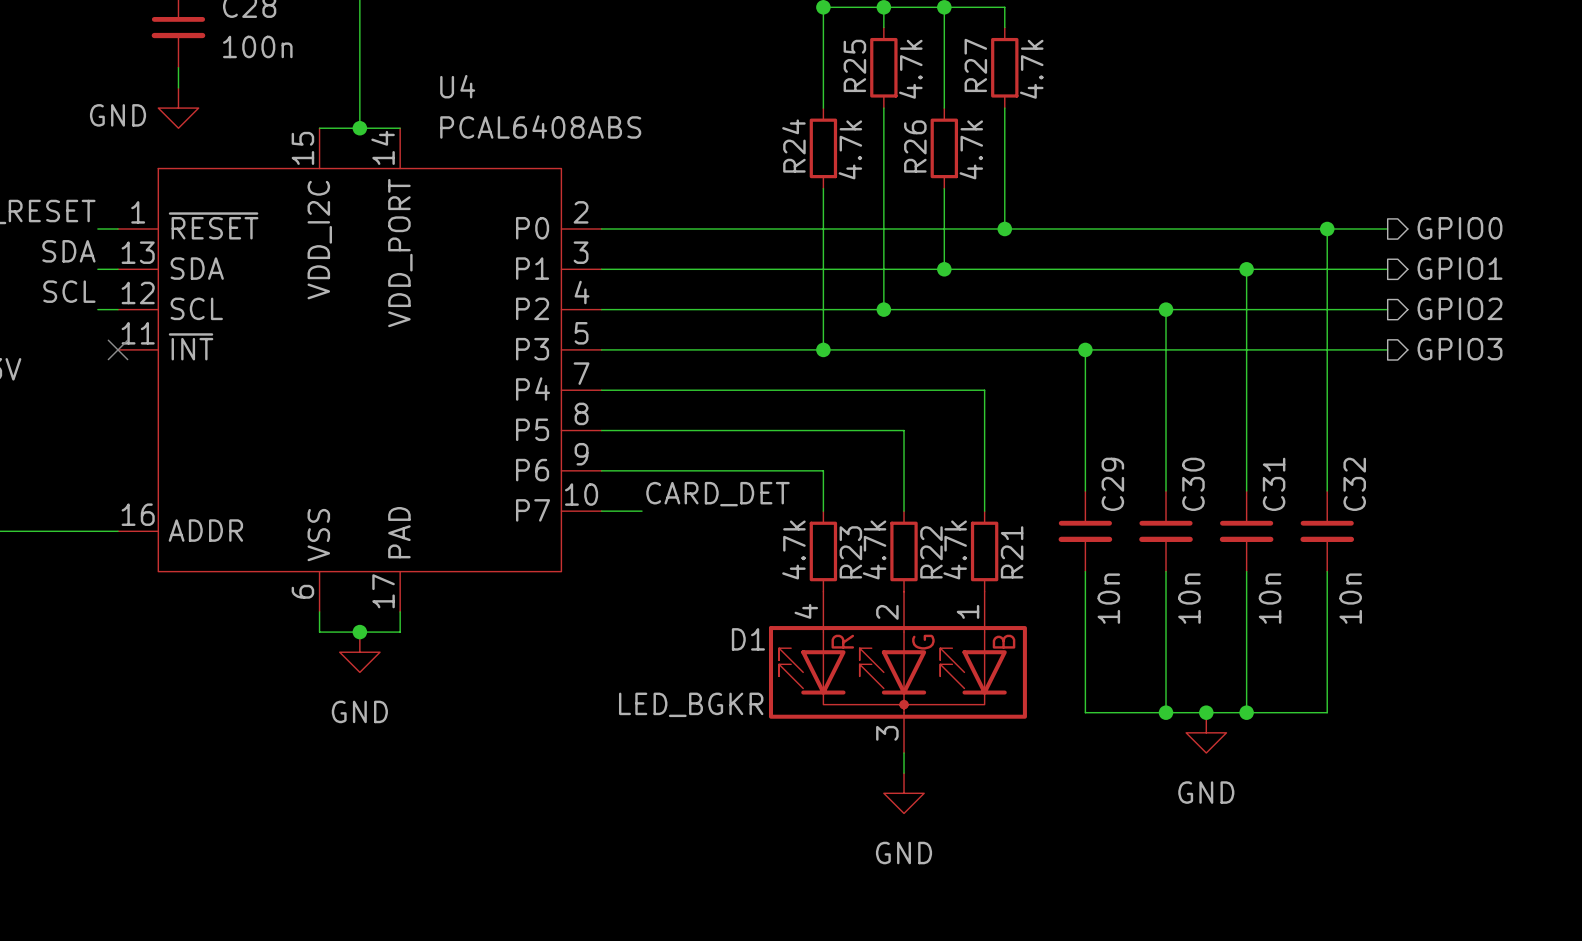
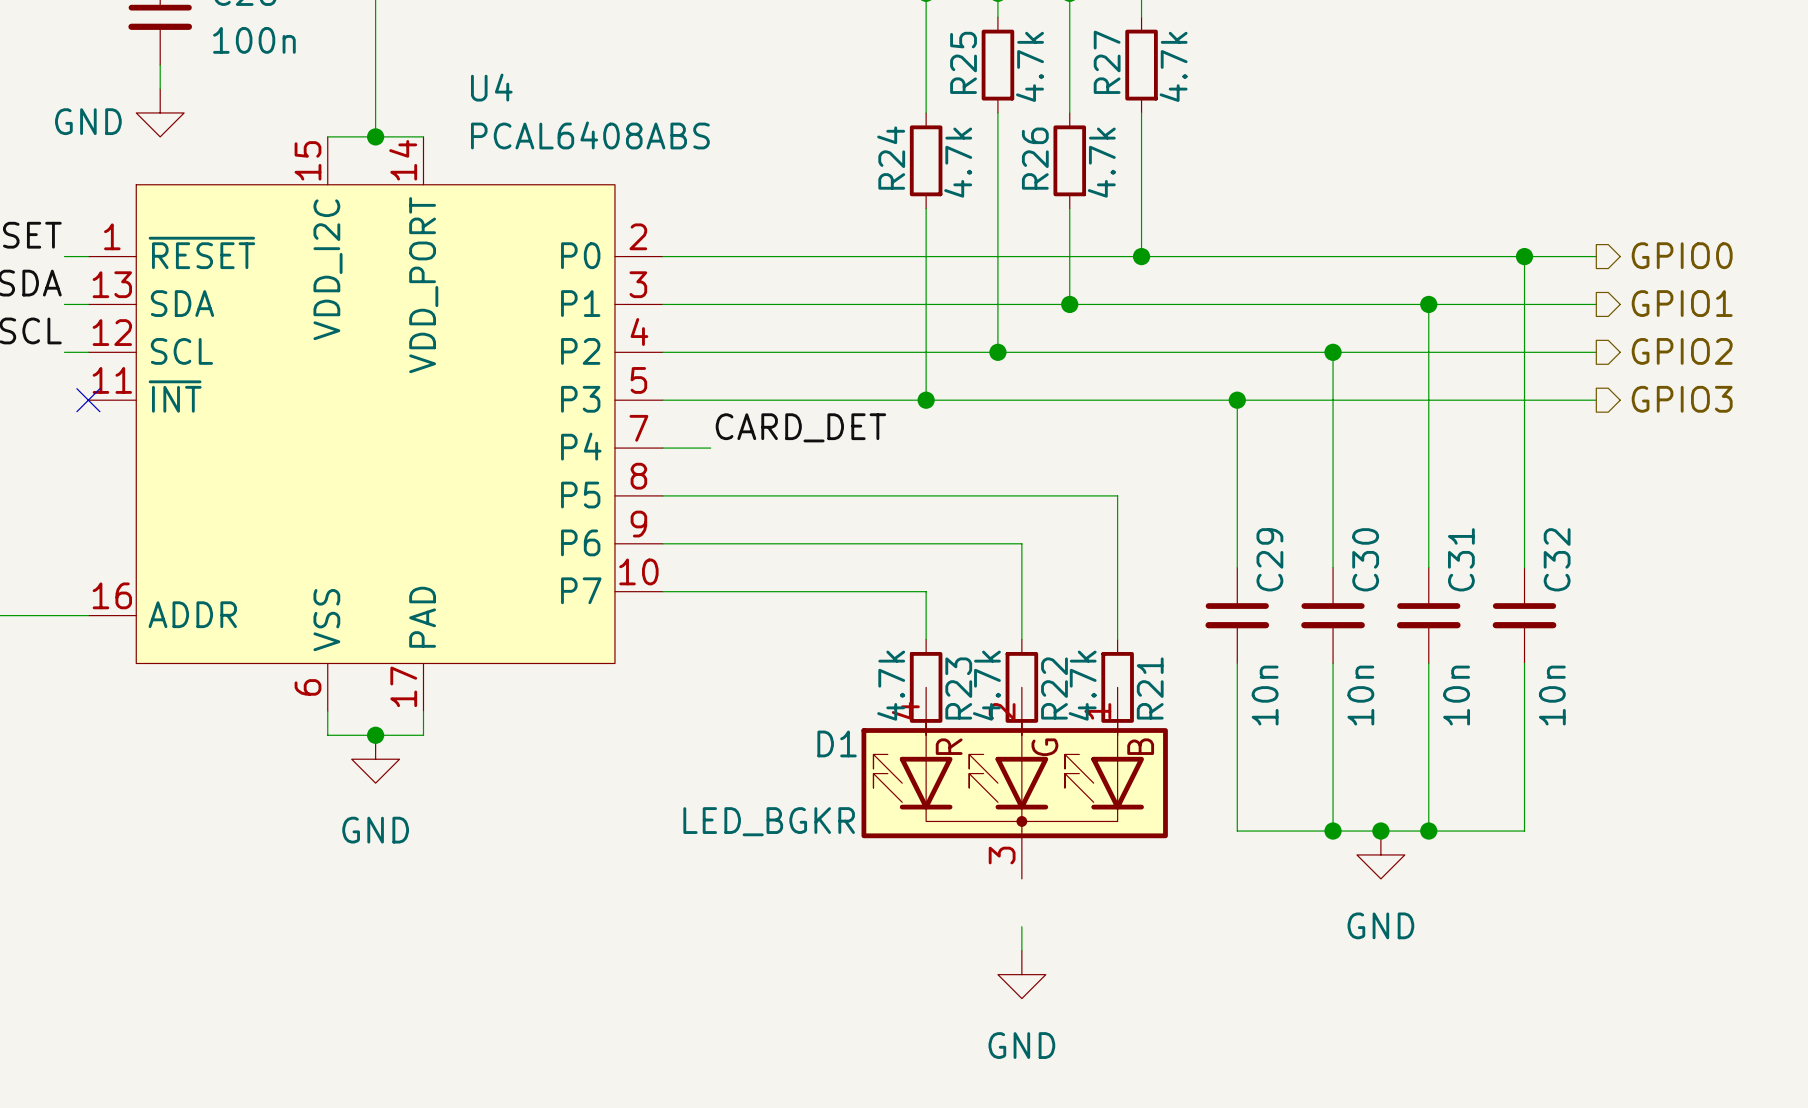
wire: (642, 390) (984, 390) (984, 430) -> none
wire: (904, 430) (904, 470) -> (1021, 495) (1117, 495)
wire: (823, 470) (823, 511) -> (926, 543) (1021, 543)
label position: CARD_DET (717, 494) -> CARD_DET (800, 427)
wire: none -> (710, 591) (926, 591) (926, 639)
wire: none -> (1021, 591) (1021, 639)
wire: none -> (1117, 591) (1117, 639)
R23 position: (823, 551) -> (926, 687)
R22 position: (904, 551) -> (1021, 687)
R21 position: (984, 551) -> (1117, 687)
wire: (904, 752) (904, 773) -> (1021, 926) (1021, 950)
power symbol position: GND (904, 793) -> GND (1021, 974)

